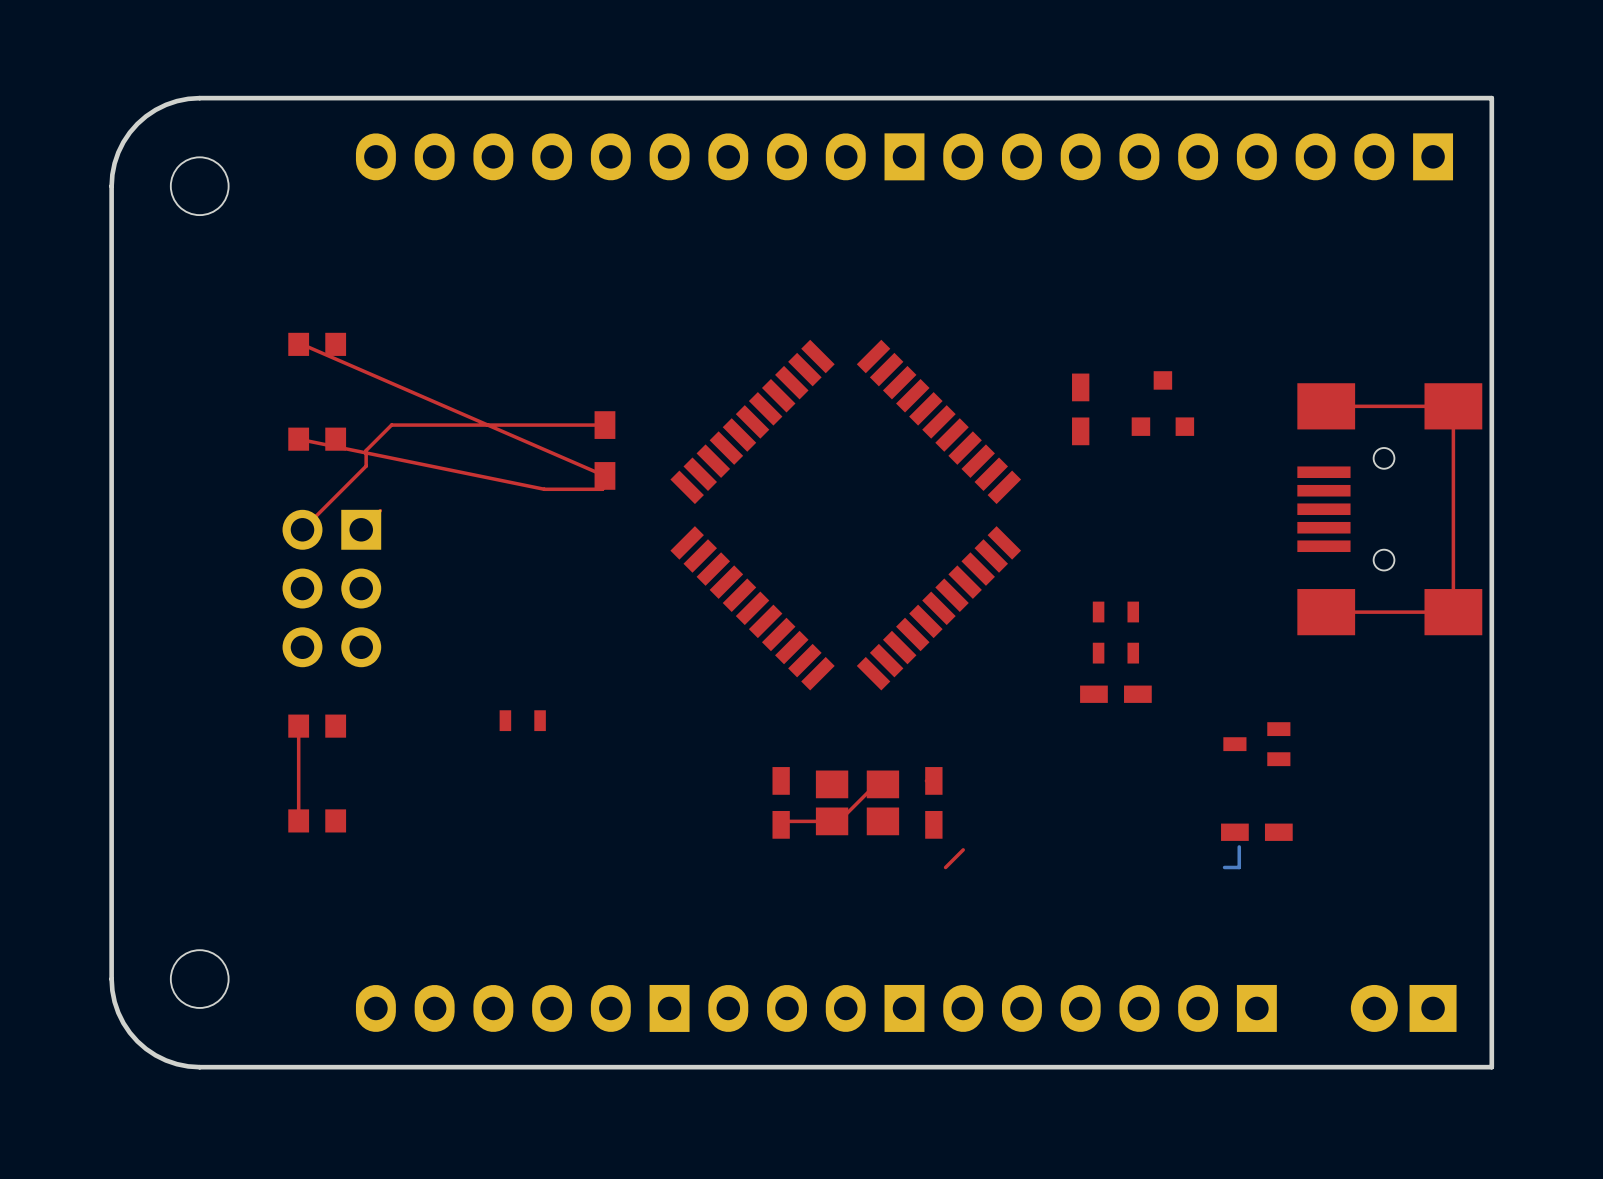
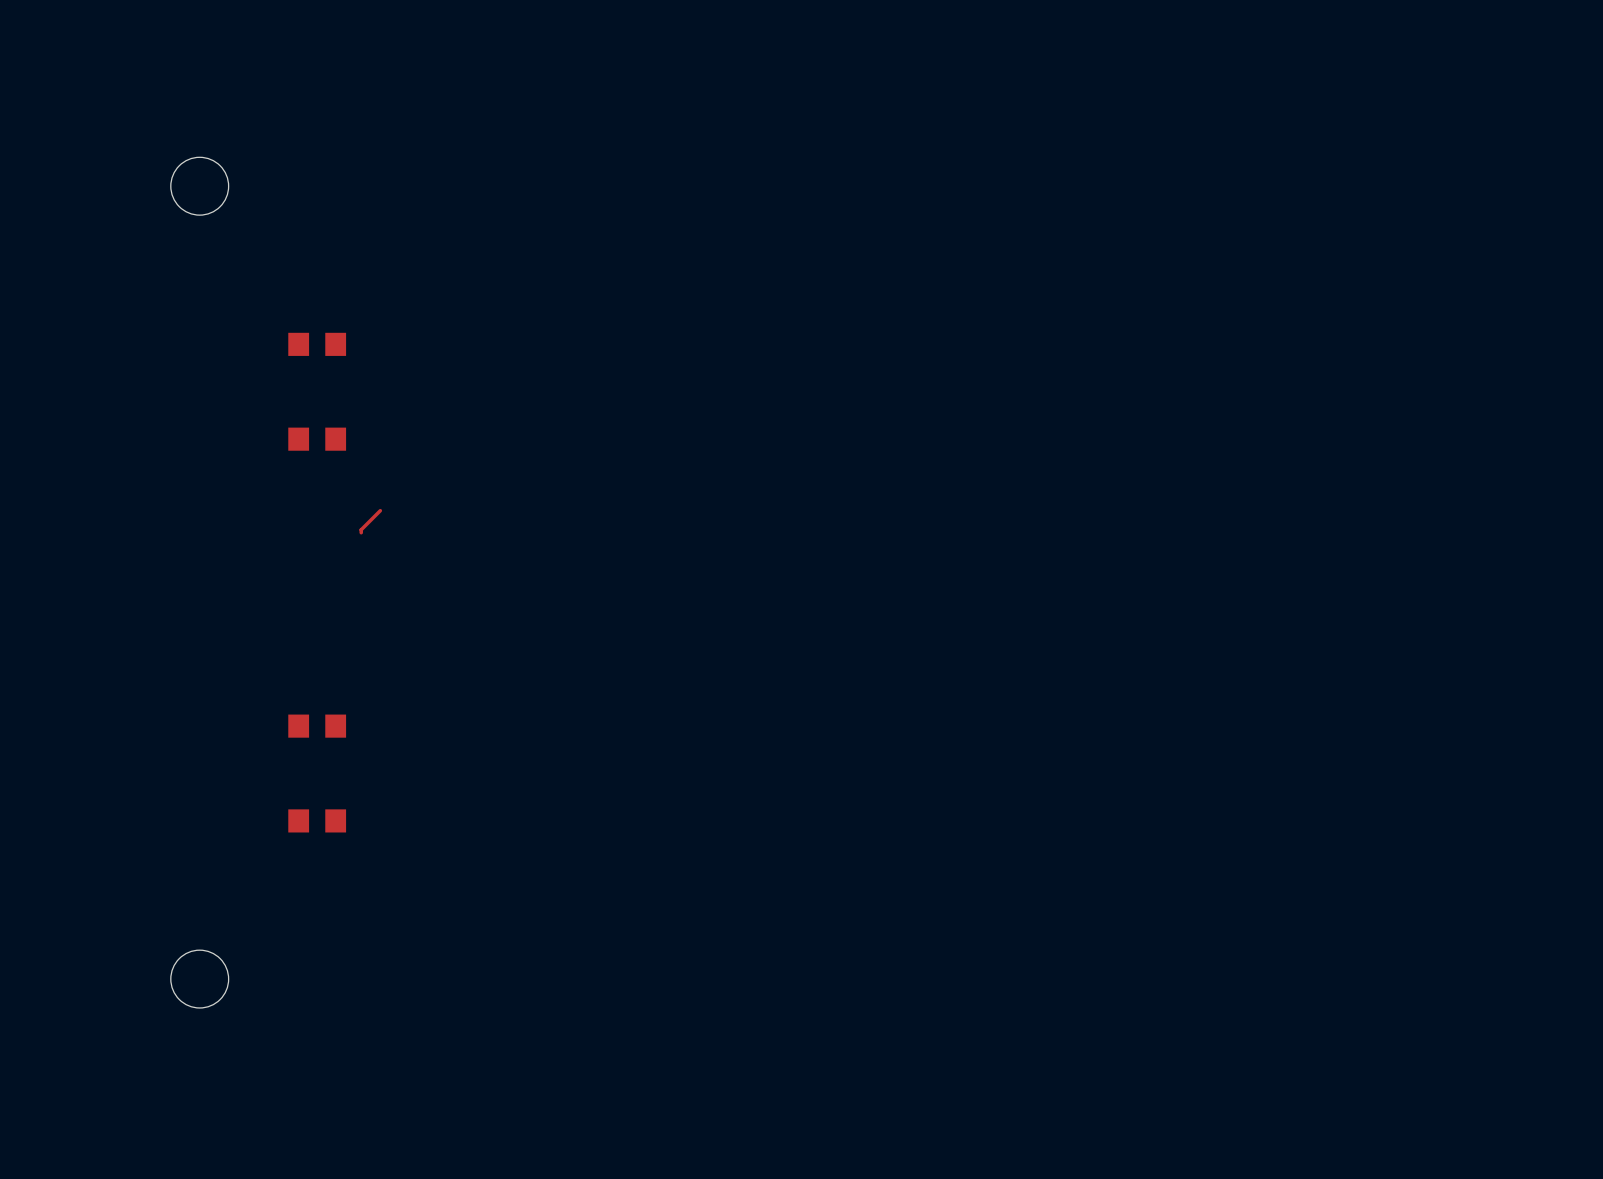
board edge: (1491, 98) (1491, 1067) (199, 1067) (176, 1064) (166, 1060) (146, 1048) (129, 1032) (118, 1012) (112, 990) (111, 979) (111, 186) (114, 163) (123, 142) (129, 132) (146, 116) (155, 109) (176, 101) (199, 98) (1491, 98) -> none
part: (640, 156) -> none
part: (1198, 156) -> none
top track: (1198, 174) (1192, 174) -> none
top track: (298, 344) (296, 341) (604, 475) -> none
part: (1162, 403) -> none
top track: (1326, 406) (1453, 406) (1453, 612) (1326, 612) -> none
part: (1080, 409) -> none
top track: (604, 425) (391, 425) (366, 450) (366, 466) (302, 529) -> none
top track: (298, 439) (544, 489) (602, 489) (610, 481) -> none
part: (604, 450) -> none
part: (1389, 509) -> none
part: (845, 515) -> none
part: (331, 588) -> none
part: (1115, 612) -> none
part: (1115, 653) -> none
part: (1115, 694) -> none
part: (522, 720) -> none
top track: (298, 726) (298, 820) -> none
part: (1256, 744) -> none
top track: (882, 784) (876, 784) (839, 821) (784, 821) (781, 824) -> none
part: (781, 802) -> none
part: (857, 802) -> none
part: (933, 802) -> none
part: (1256, 832) -> none
bottom track: (1239, 846) (1239, 867) (1224, 867) -> none
top track: (963, 849) (945, 867) -> none
part: (522, 1008) -> none
part: (816, 1008) -> none
part: (1110, 1008) -> none
part: (1403, 1008) -> none

